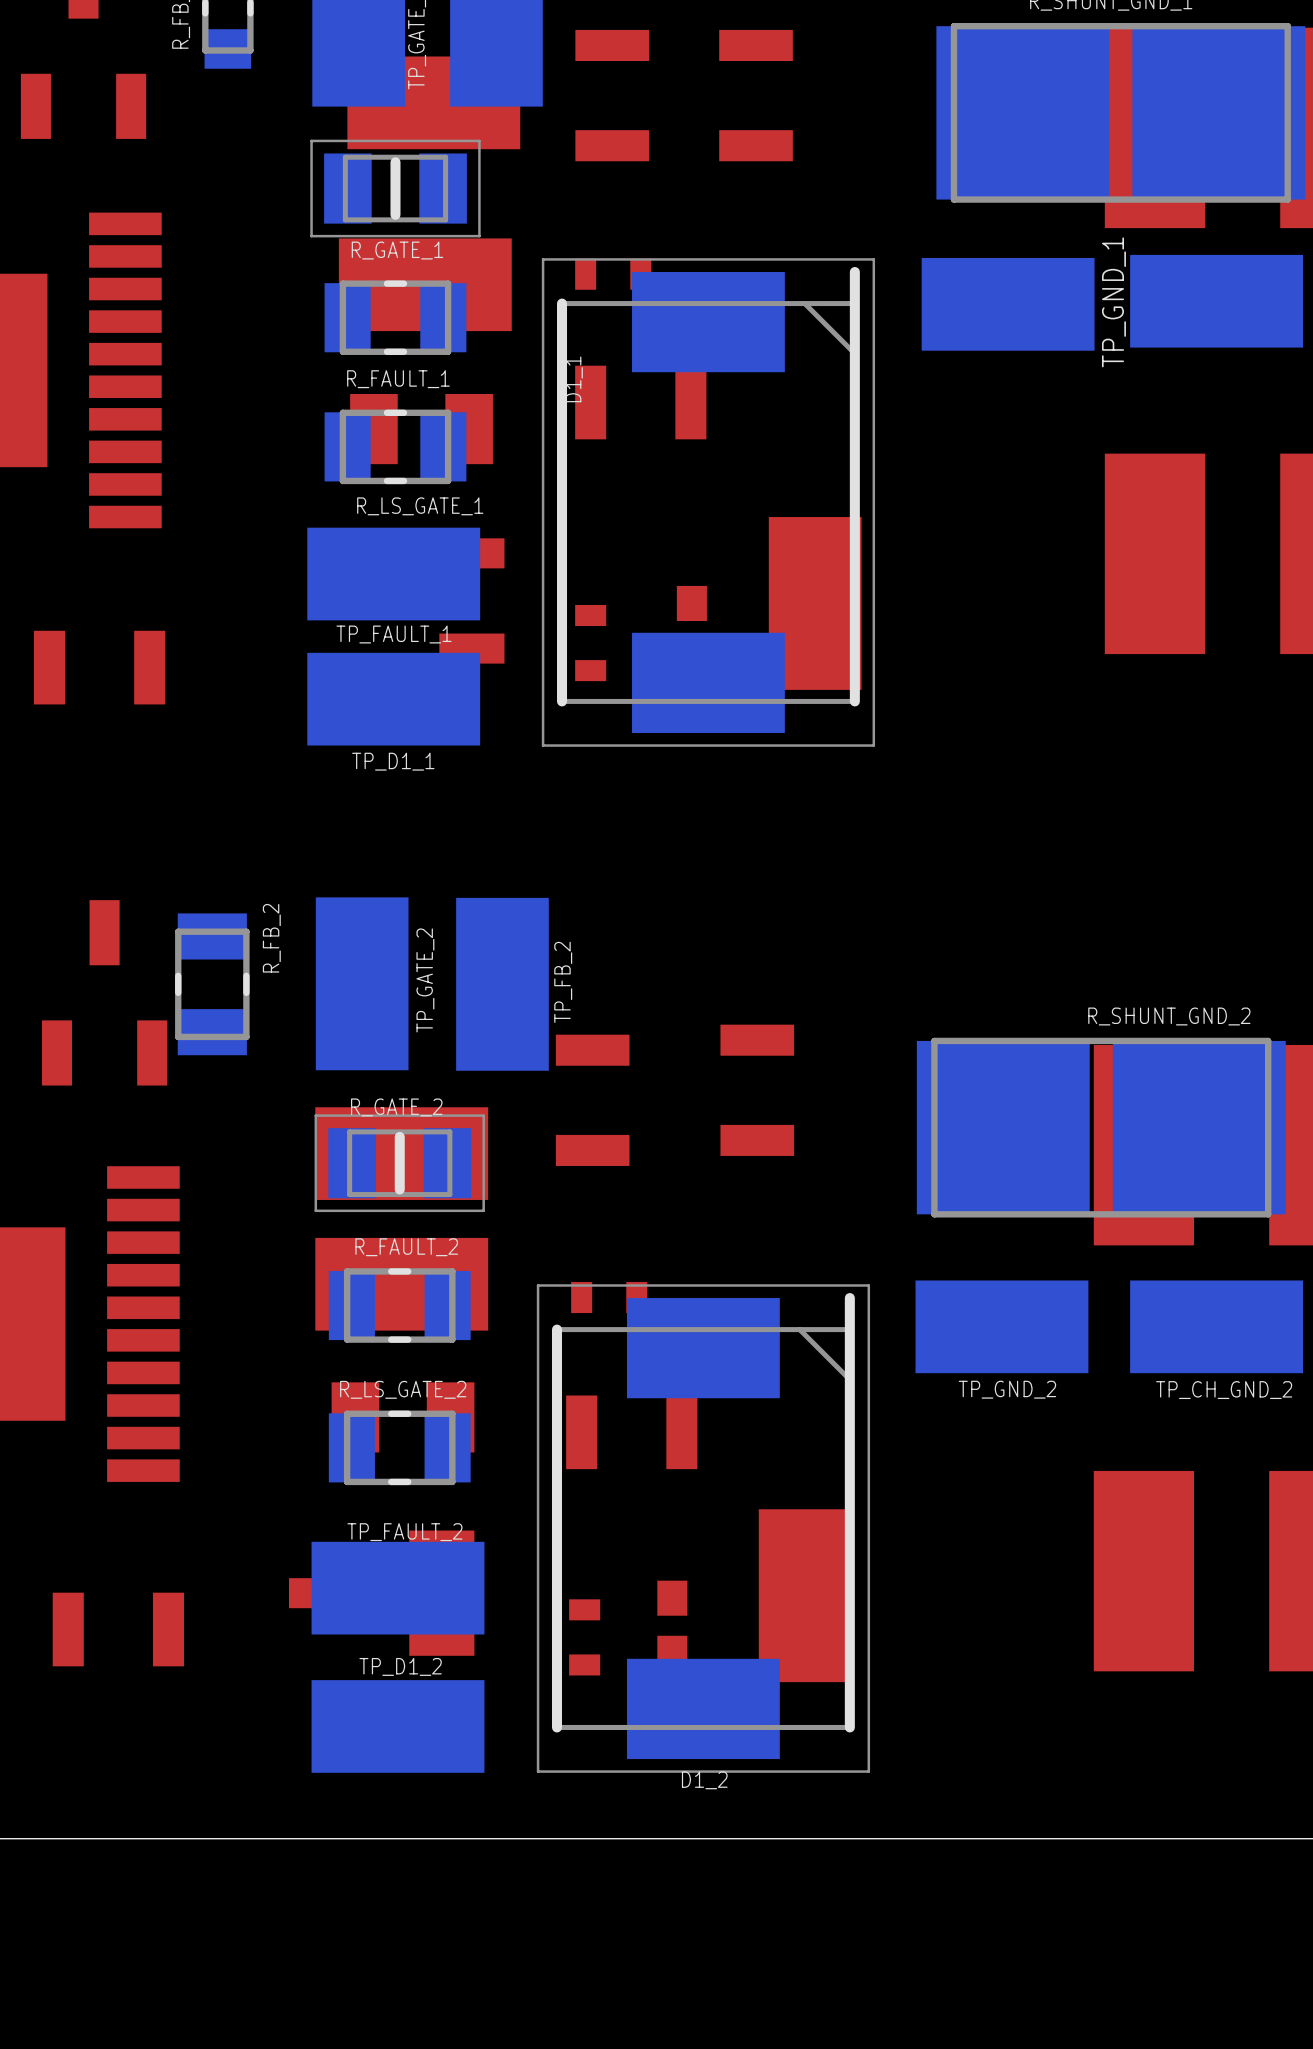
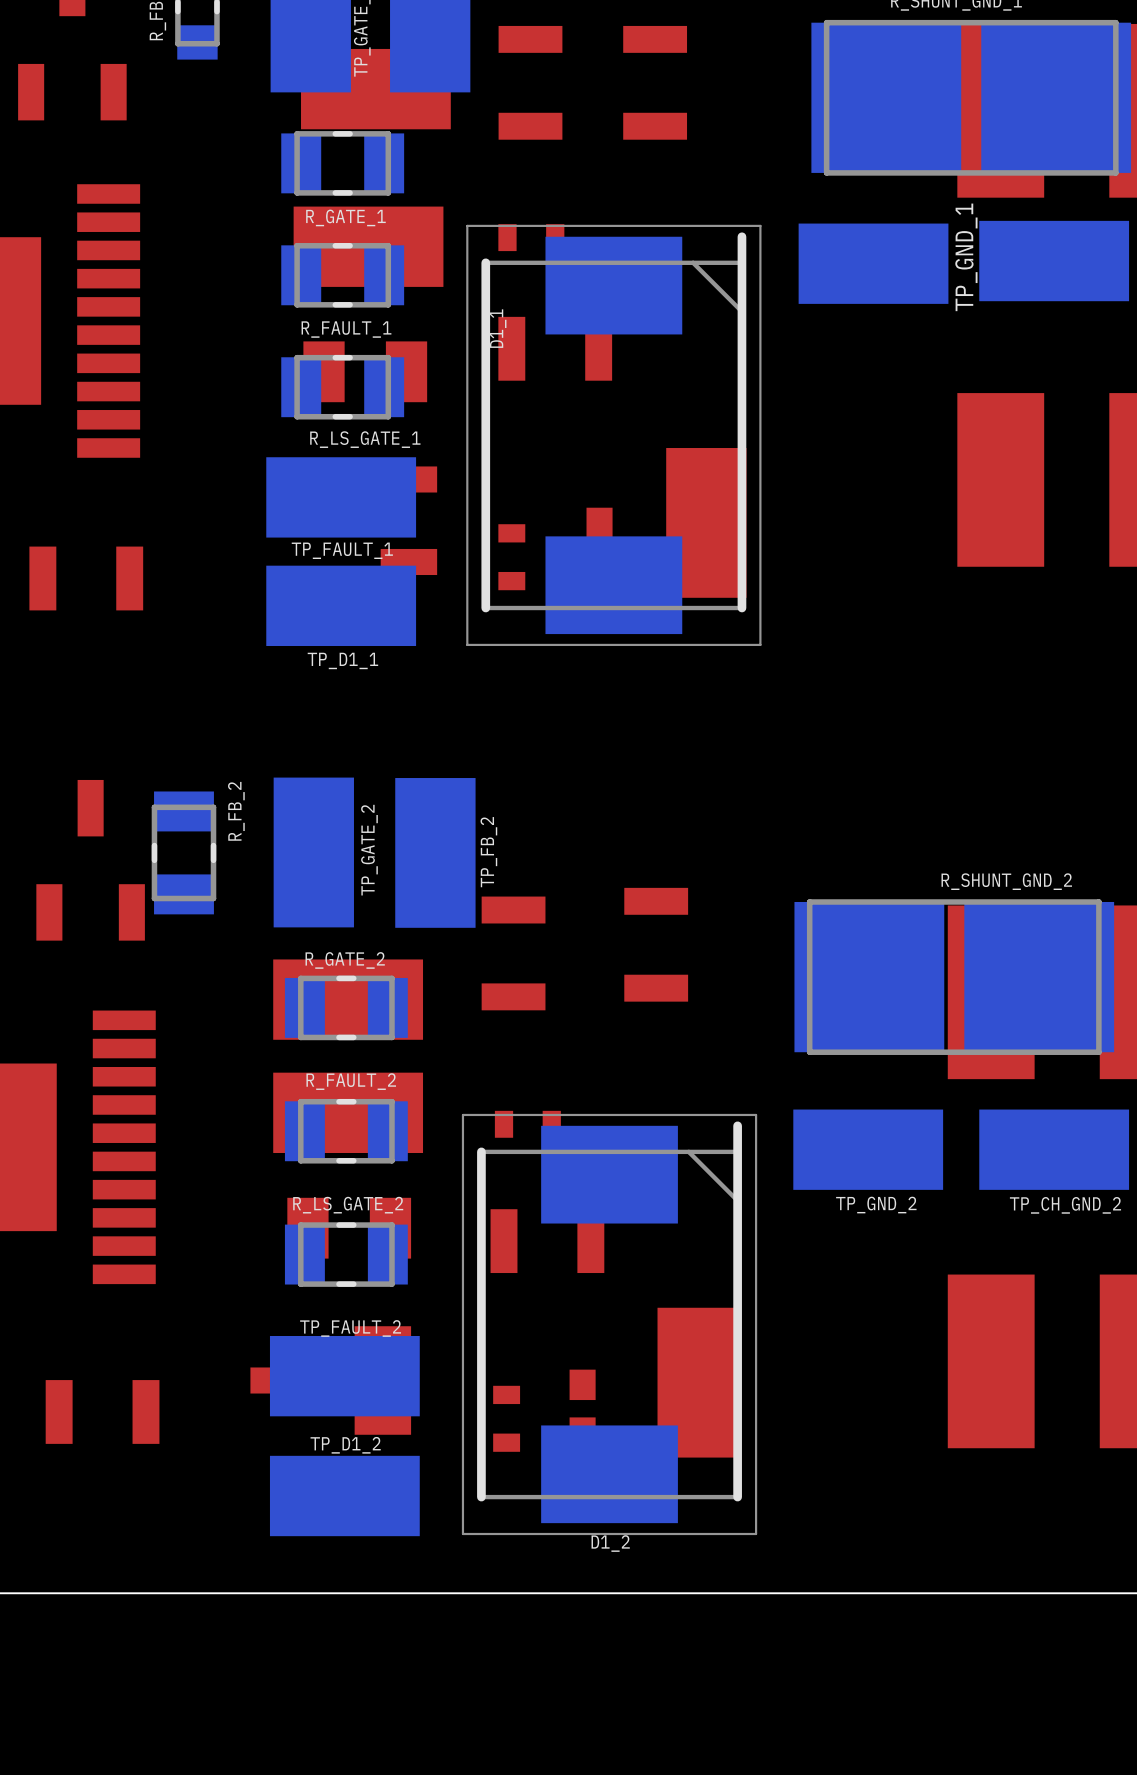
R_GATE_1 footprint: [310, 139, 481, 238] -> [281, 131, 405, 196]
D1_1 footprint: [541, 258, 876, 747] -> [466, 224, 762, 647]
R_GATE_2 footprint: [314, 1114, 485, 1213] -> [284, 975, 408, 1041]
D1_2 footprint: [536, 1284, 871, 1773] -> [461, 1113, 758, 1536]

